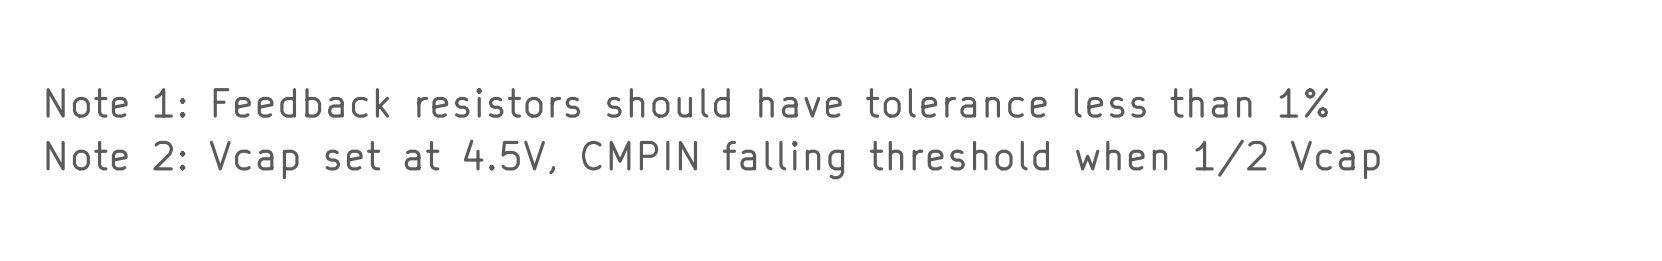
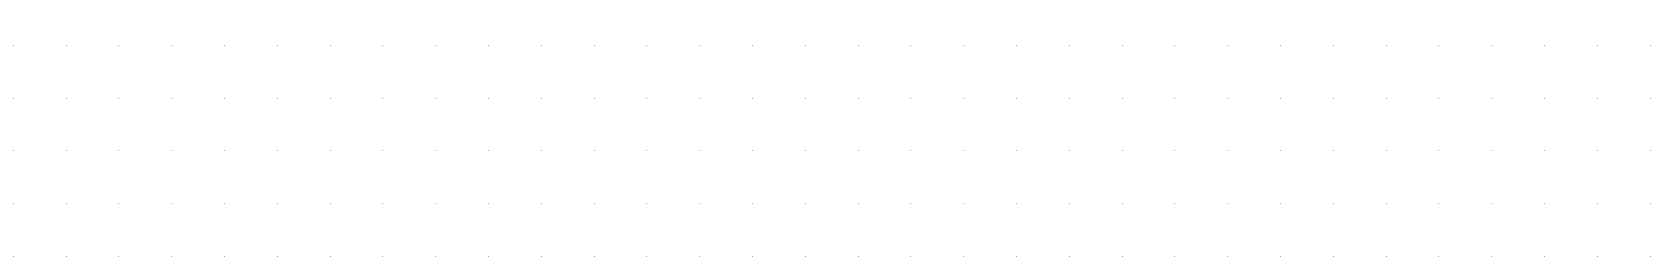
text: Note 1: Feedback resistors should have tolerance less than 1% (687, 102) -> none
text: Note 2: Vcap set at 4.5V, CMPIN falling threshold when 1/2 Vcap (713, 159) -> none

